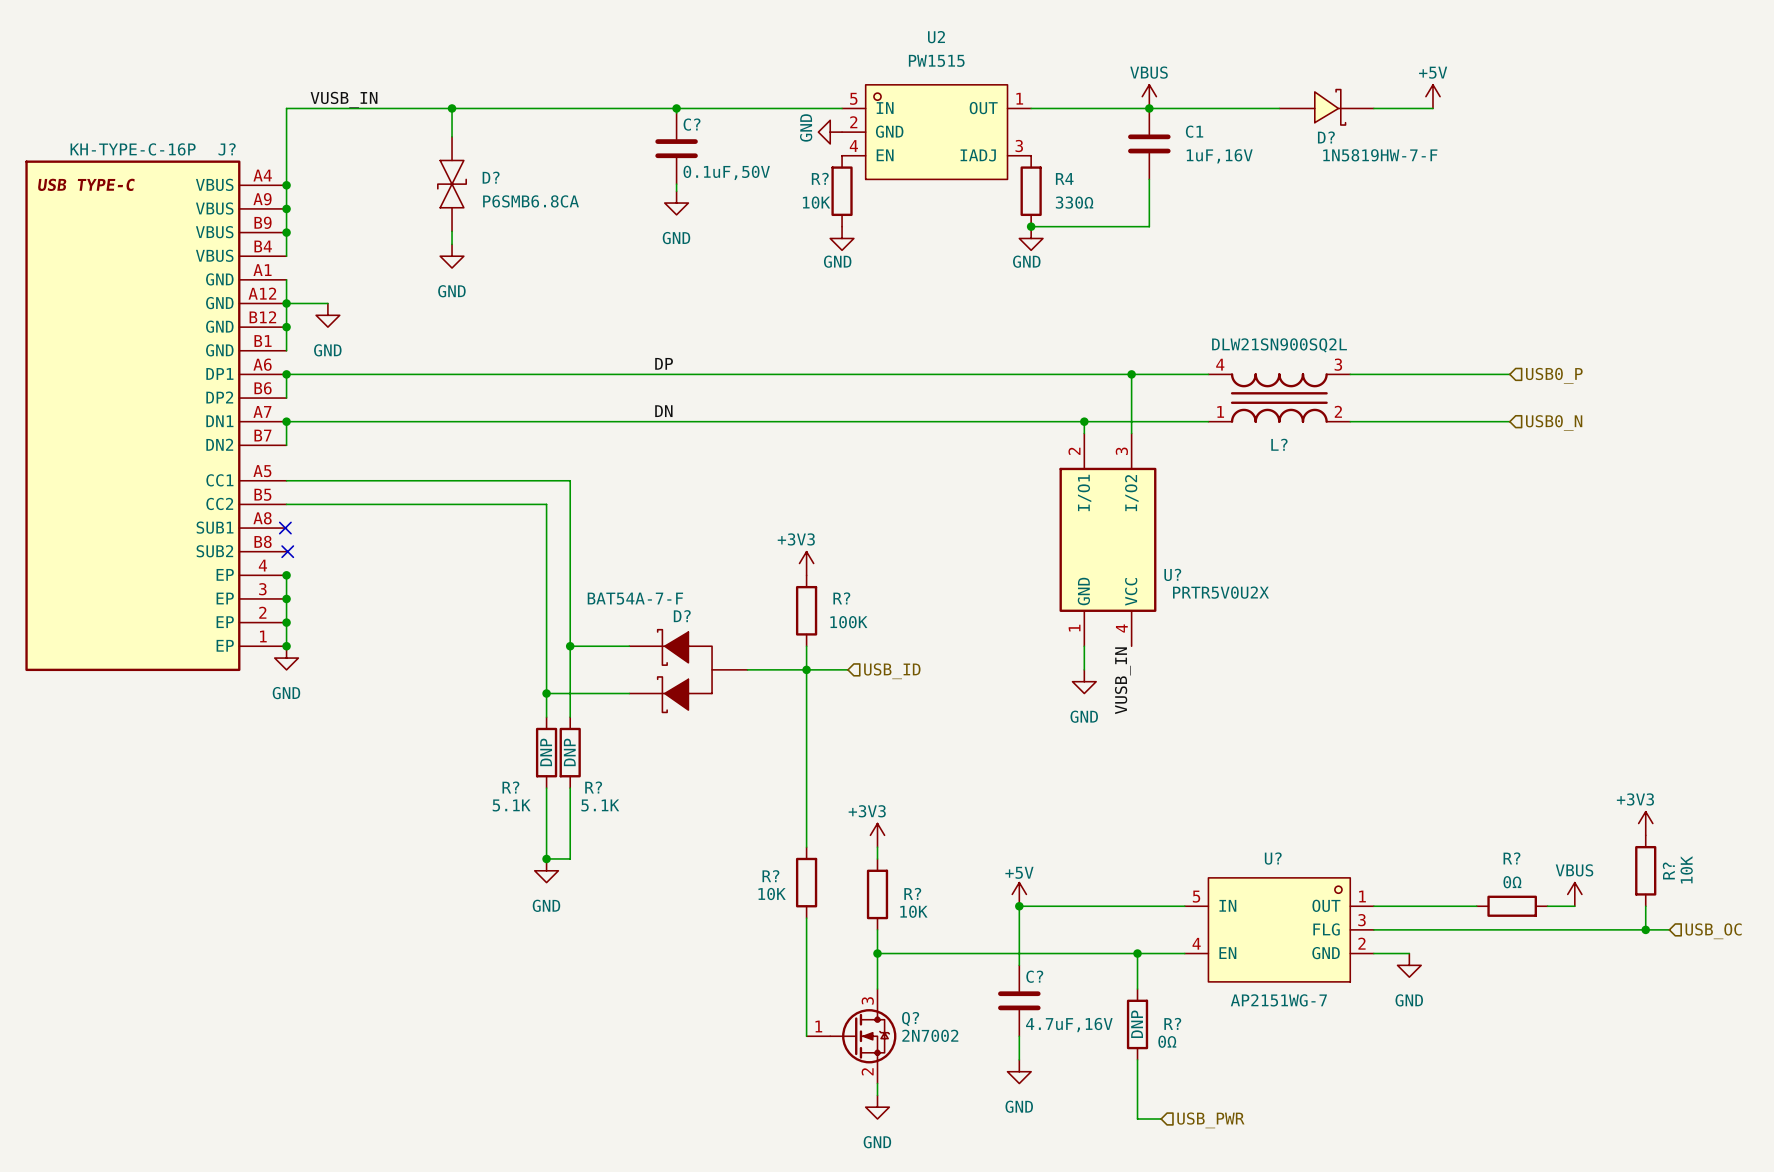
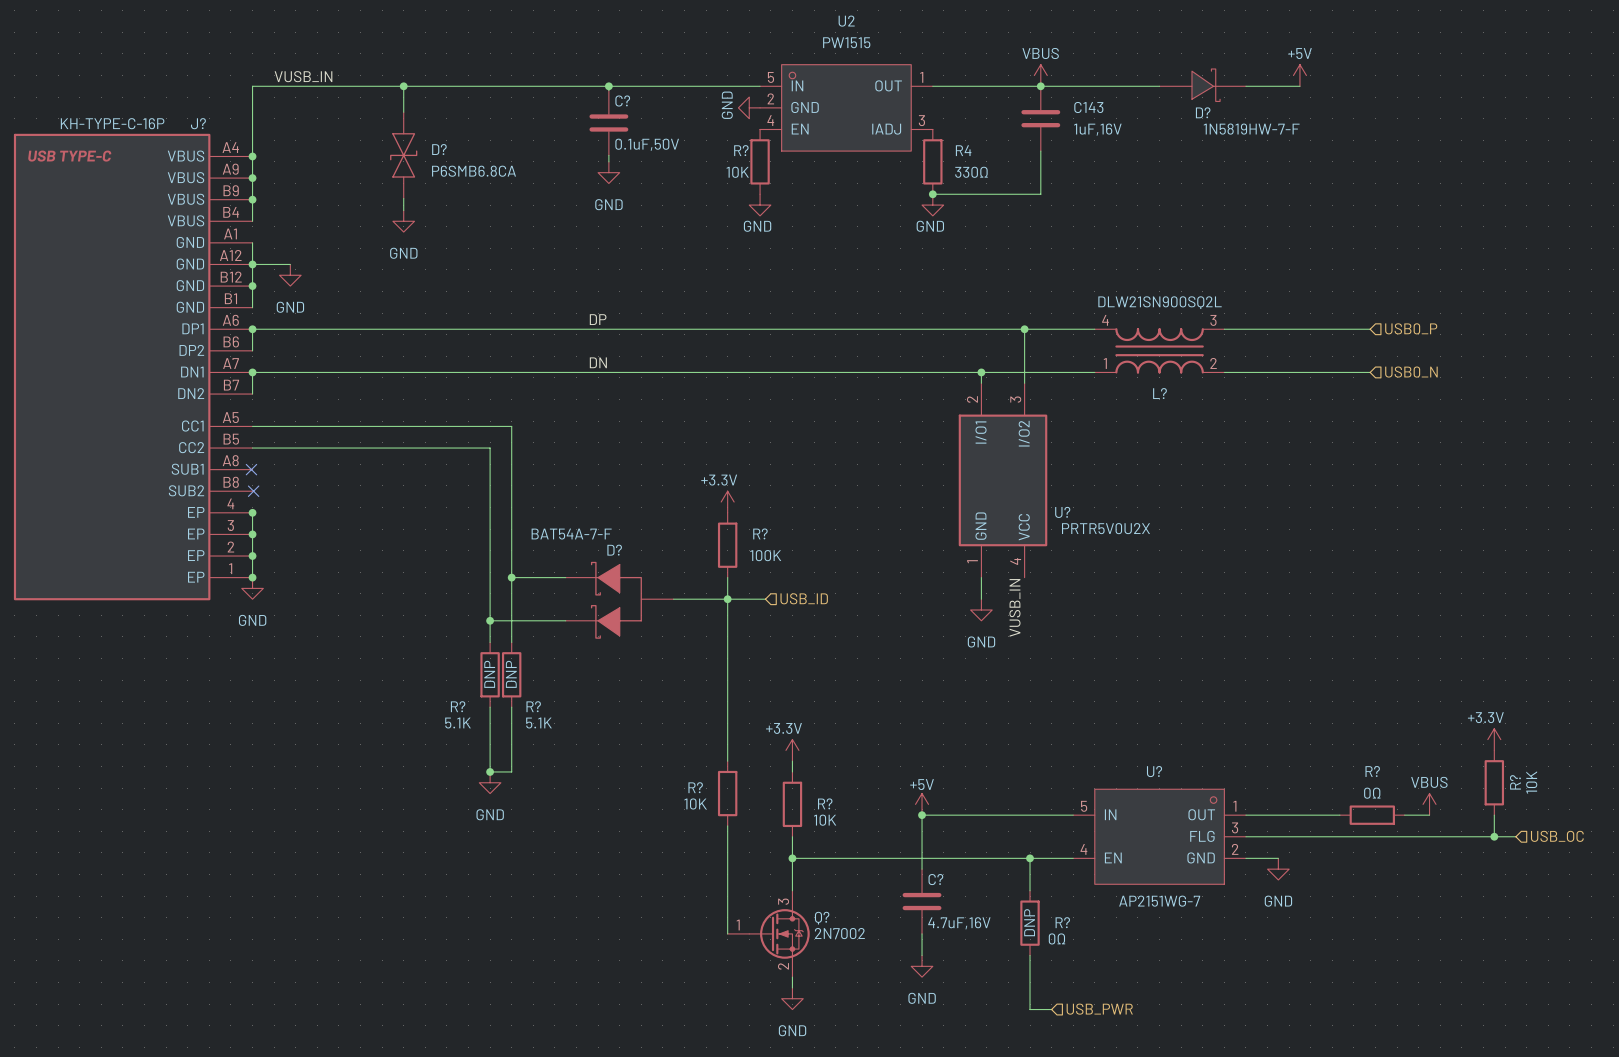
C1 name: C1 (1194, 131) -> C143 (1088, 107)
power symbol: +3V3 (806, 563) -> +3.3V (727, 502)
power symbol: +3V3 (1645, 823) -> +3.3V (1494, 739)
power symbol: +3V3 (877, 835) -> +3.3V (792, 750)

